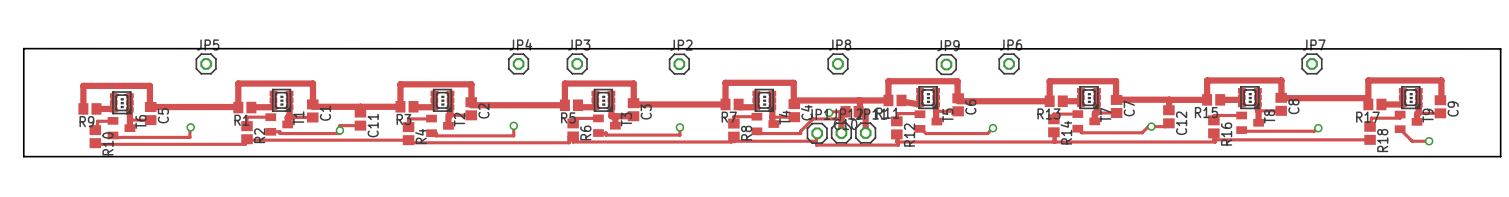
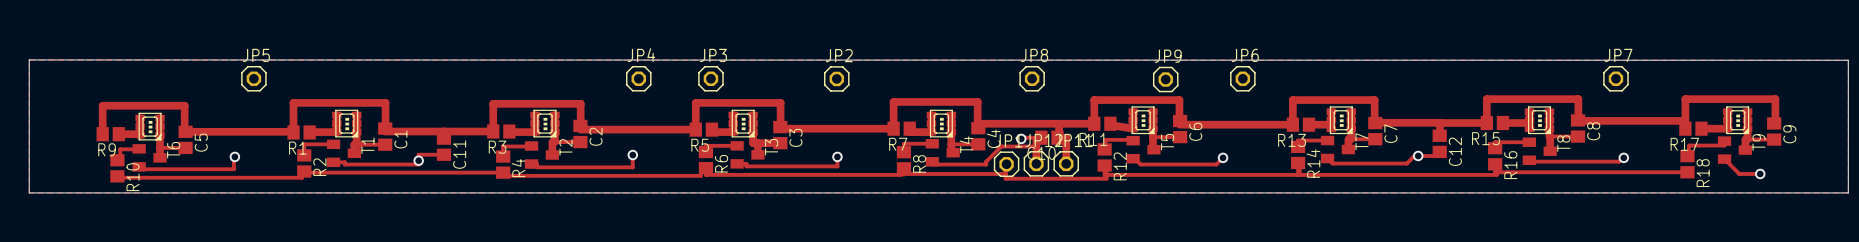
zone outline: none -> (29, 60) (29, 192) (1848, 192) (1848, 60) (29, 60)

